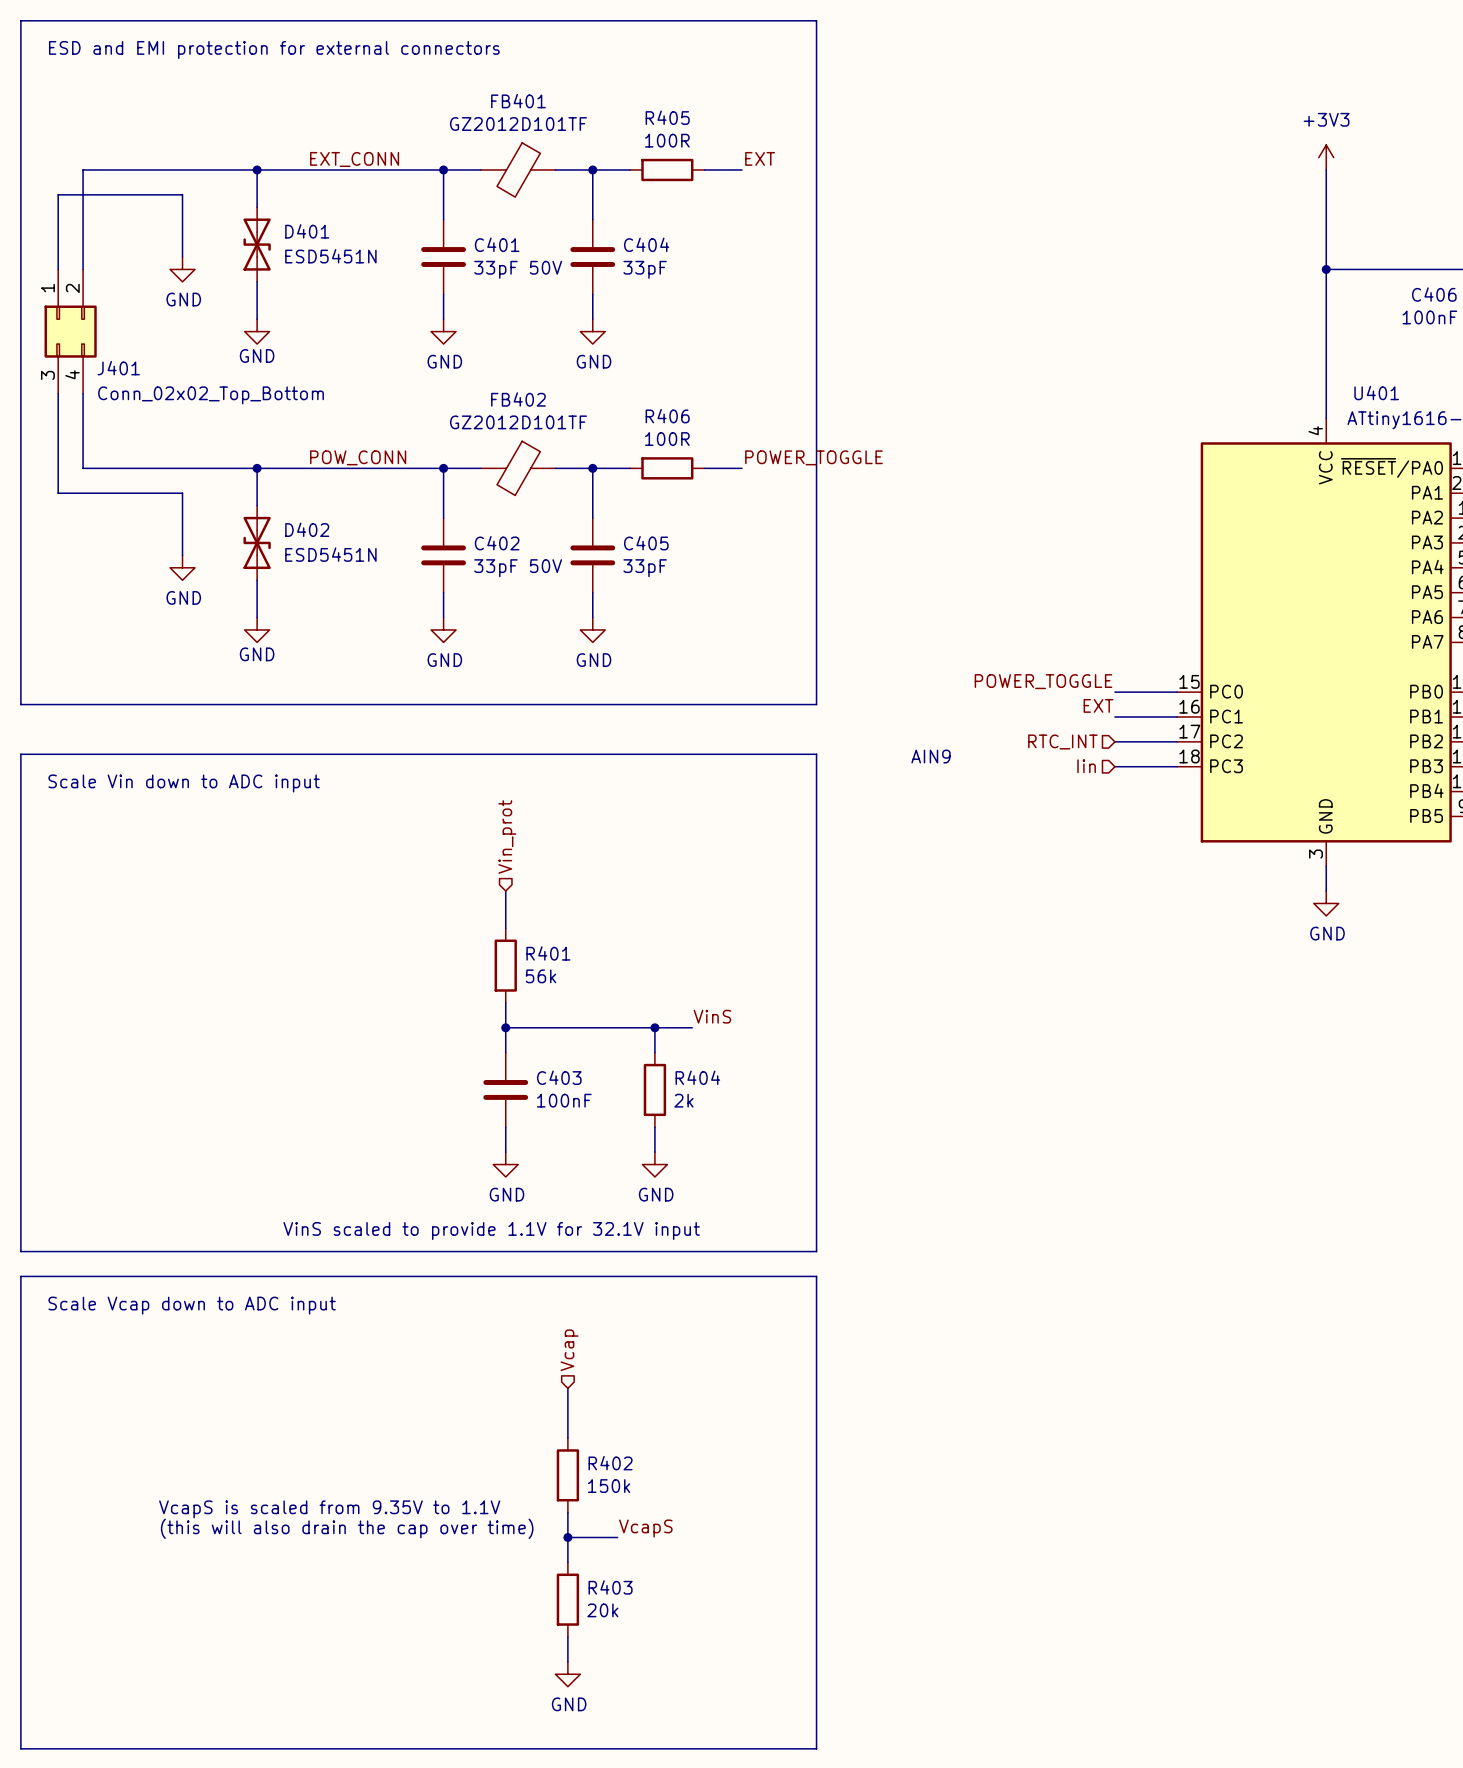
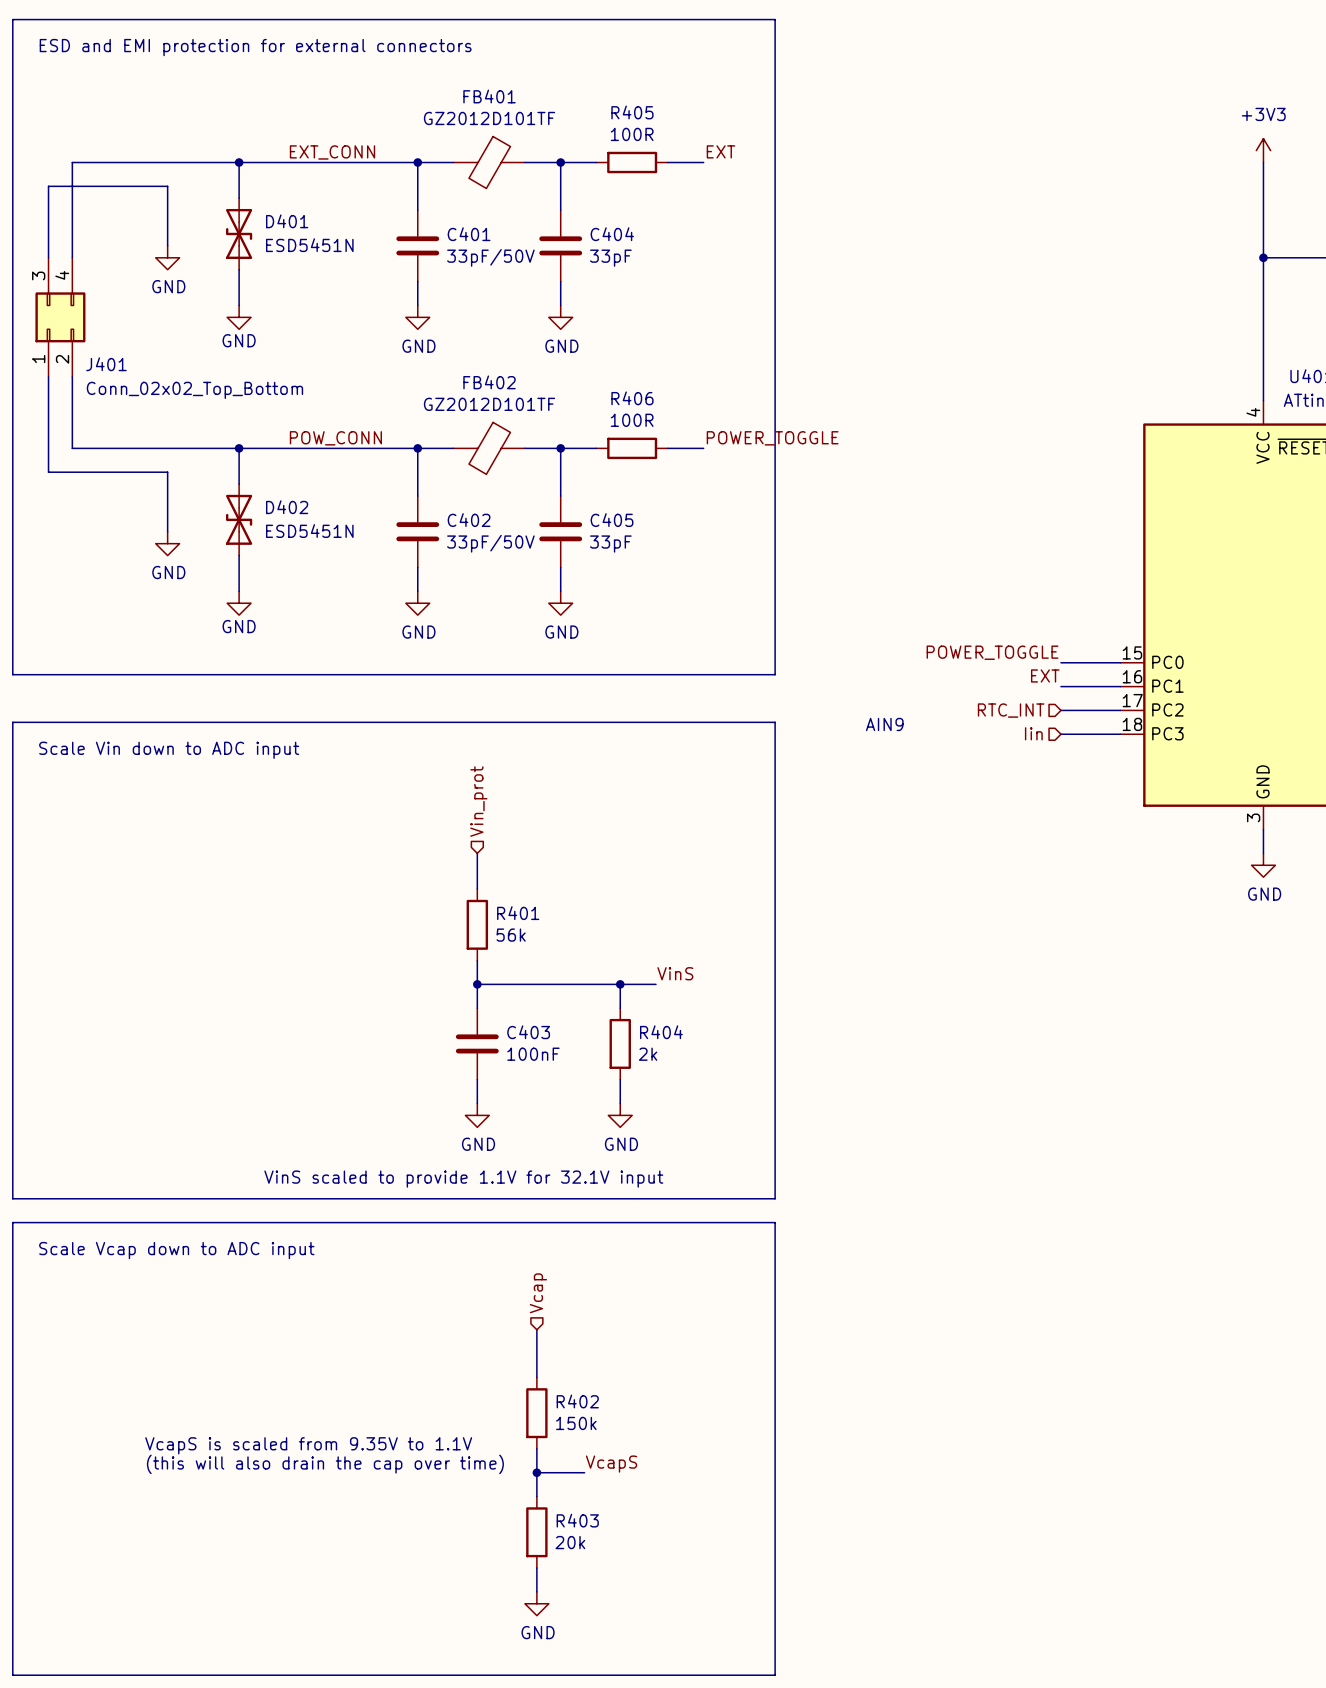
C401 value: 33pF 50V (518, 269) -> 33pF/50V (490, 257)
J401 flip: as is (70, 331) -> up-down (60, 317)
C402 value: 33pF 50V (518, 568) -> 33pF/50V (490, 543)

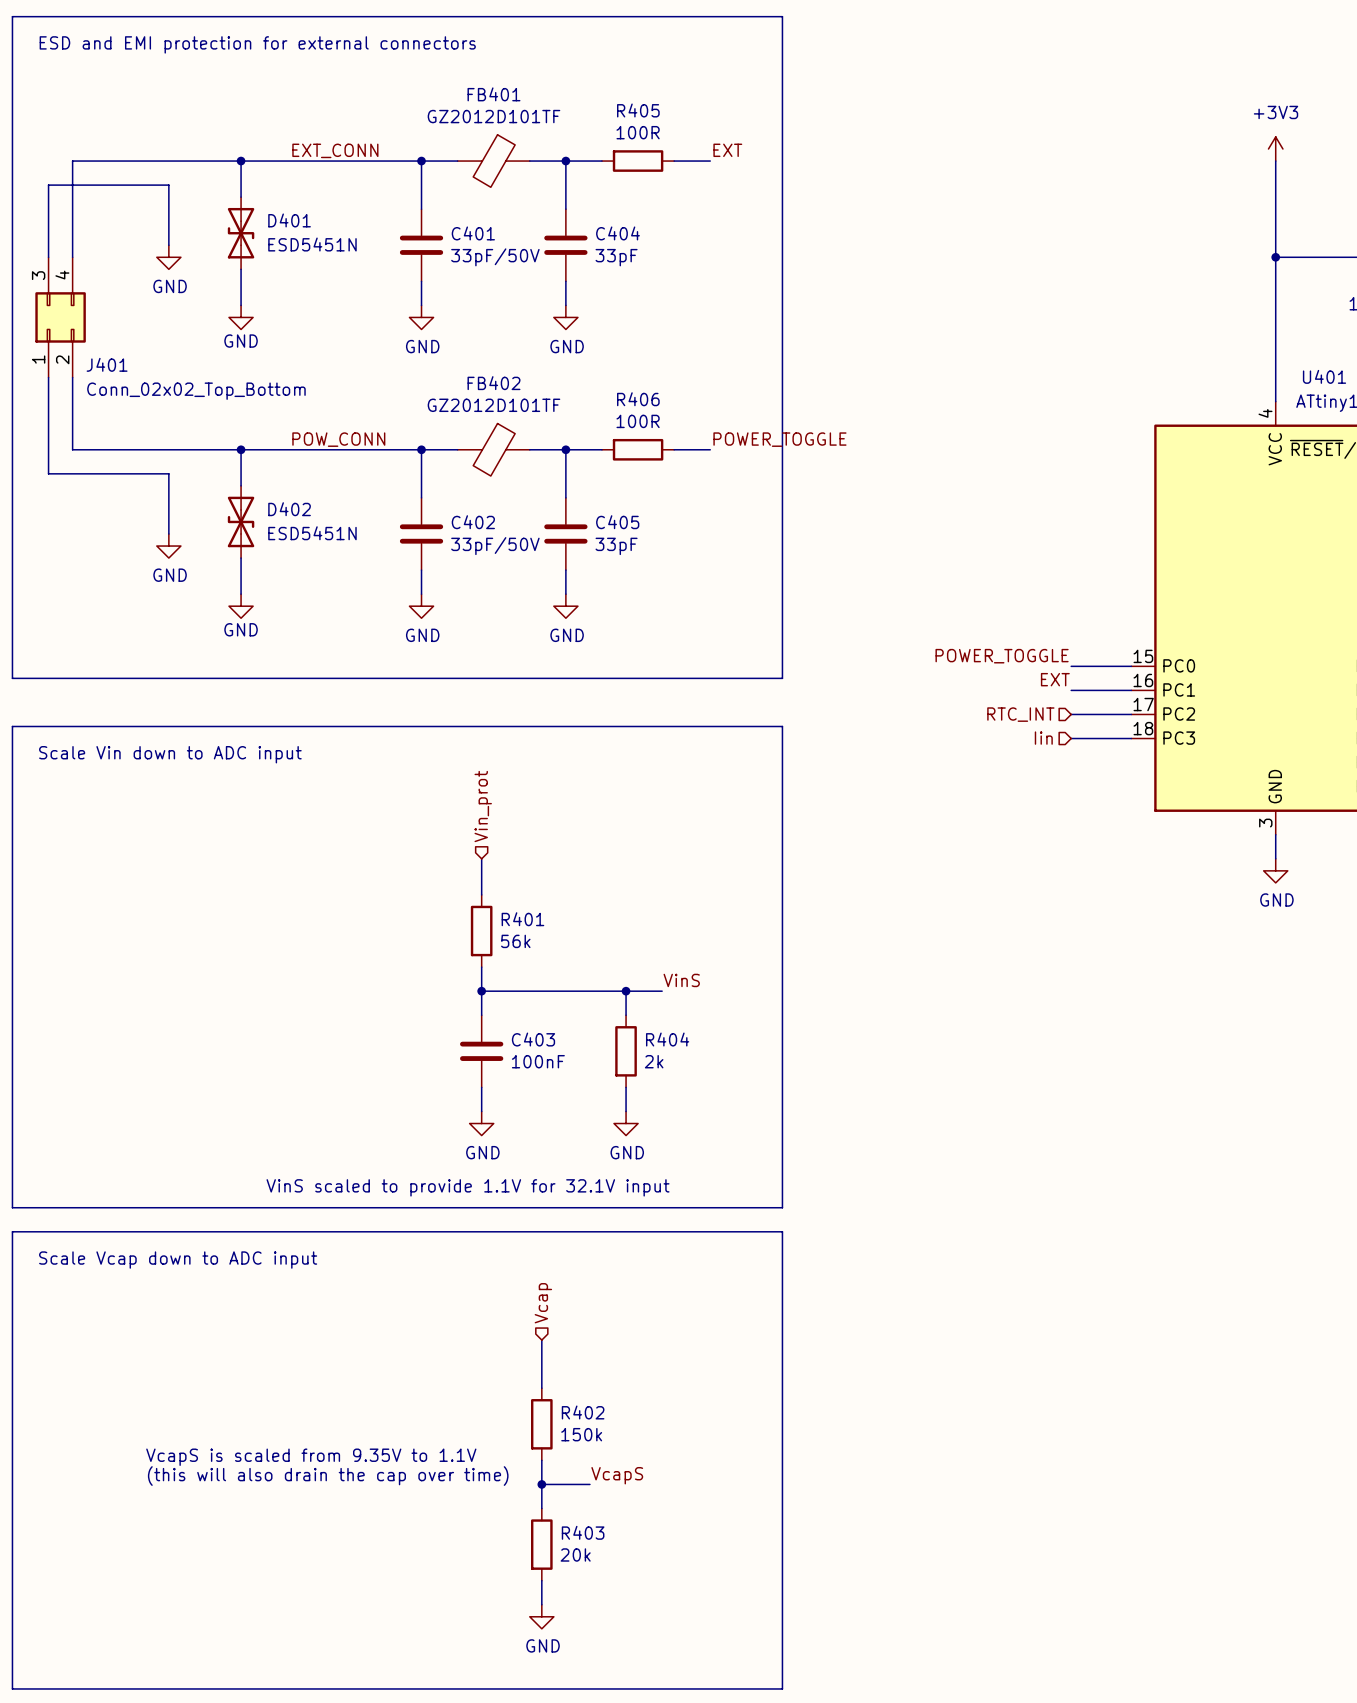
text: AIN9 (884, 724) -> none

